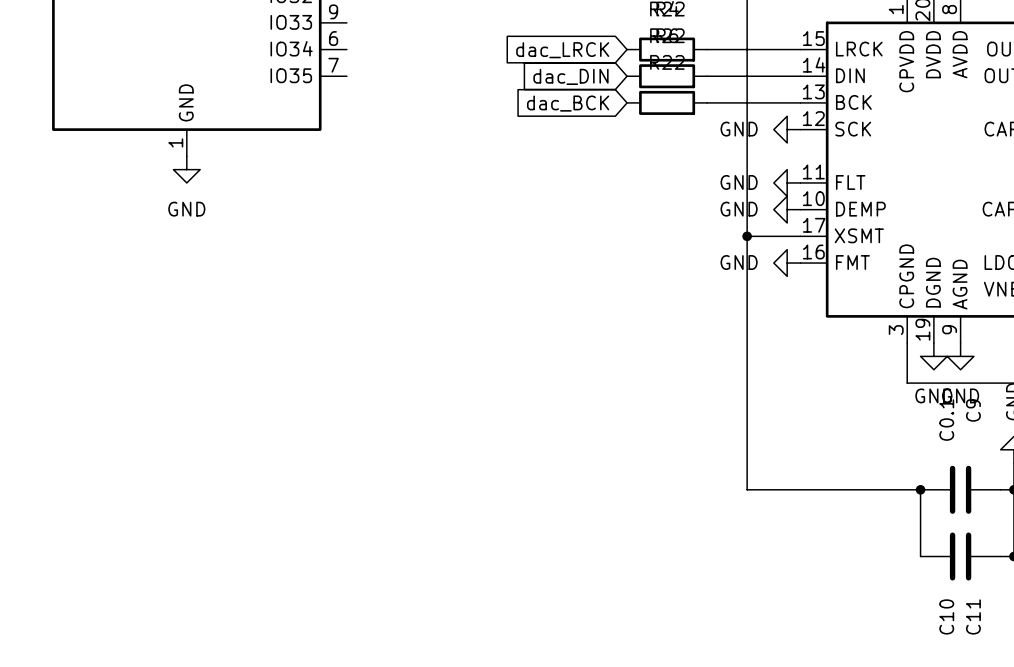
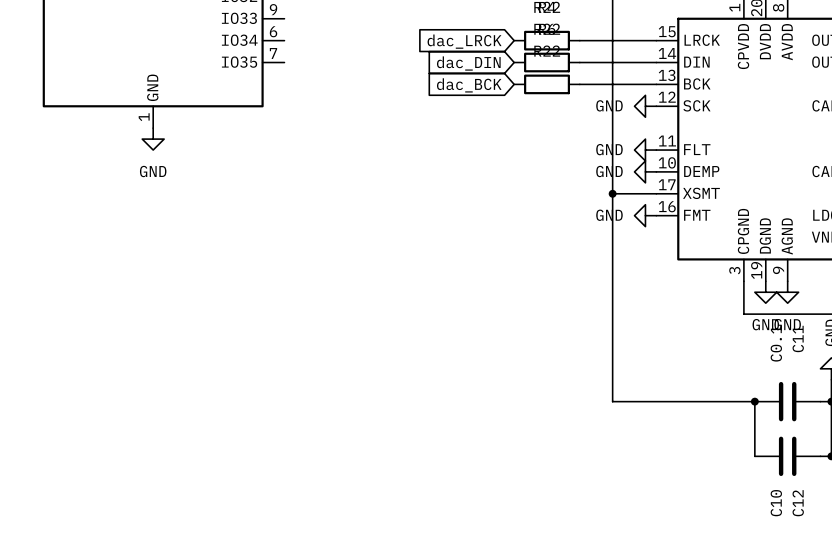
C9 name: C9 (973, 410) -> C11 (798, 338)
C11 name: C11 (973, 616) -> C12 (798, 503)

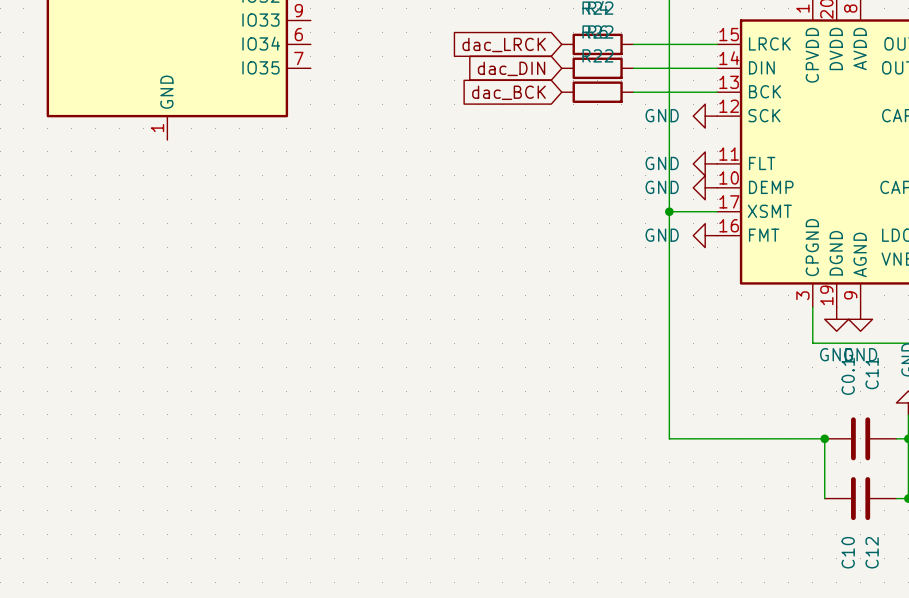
power symbol: GND (153, 139) -> none

